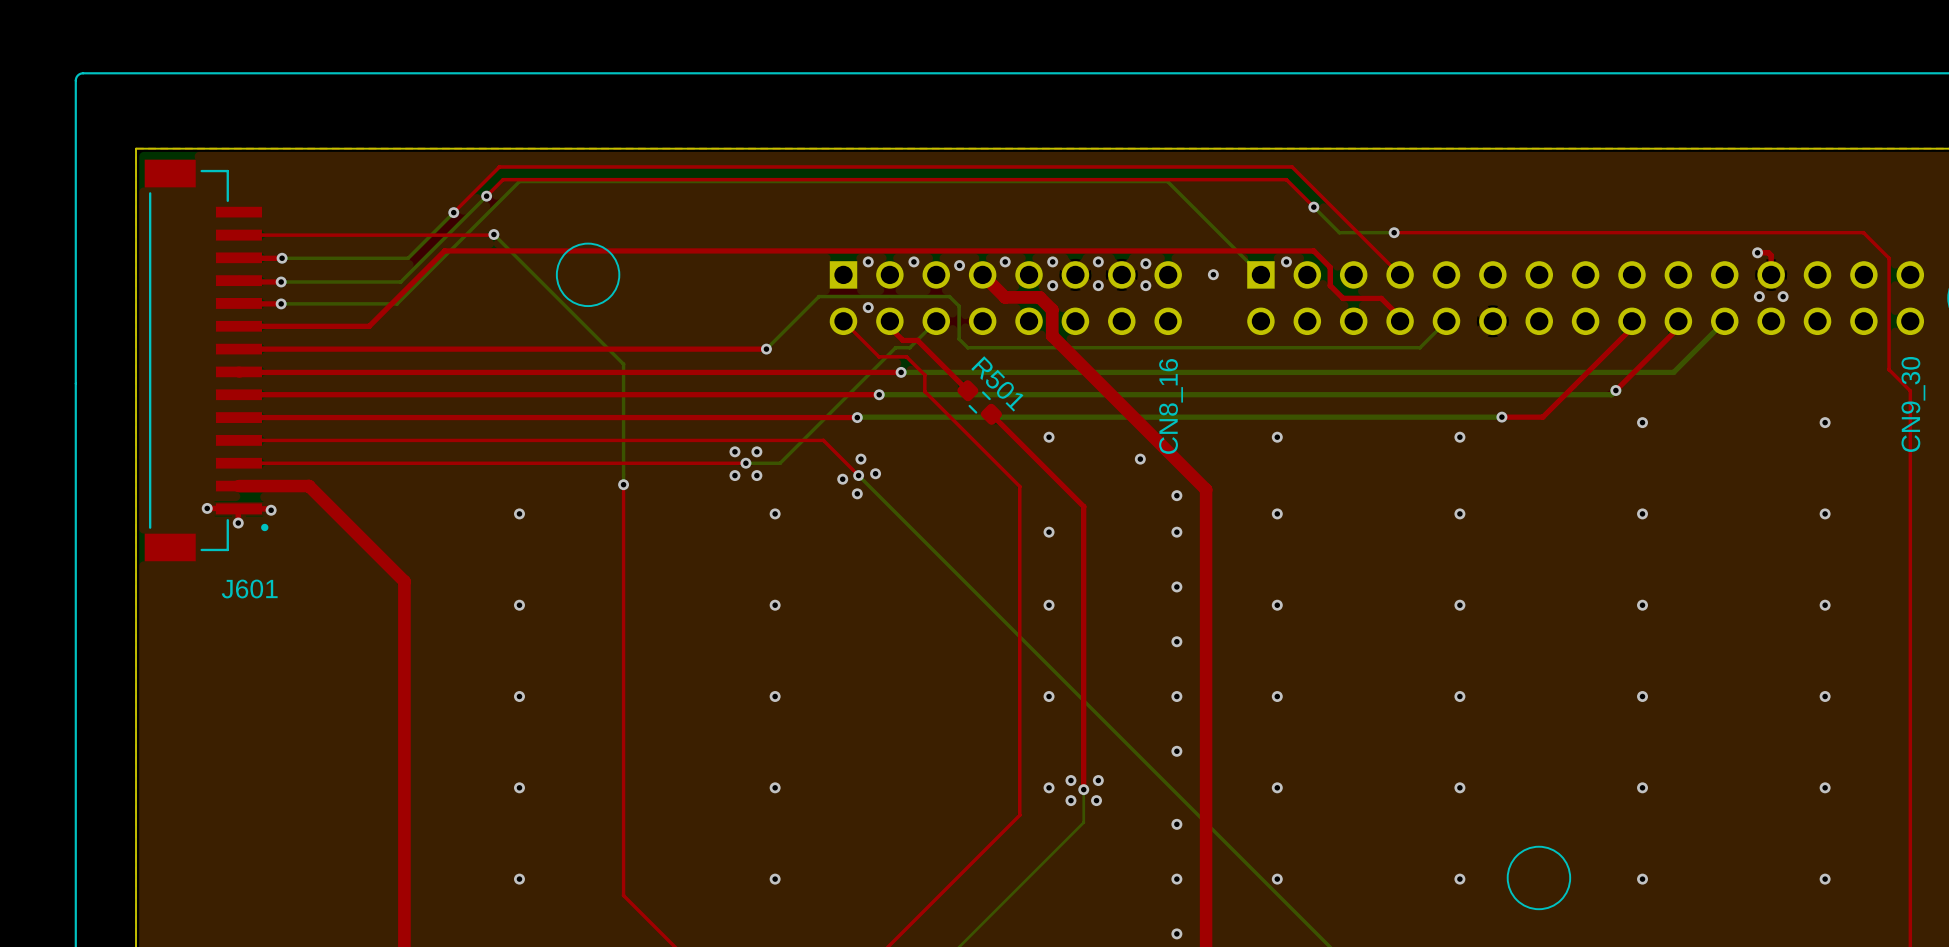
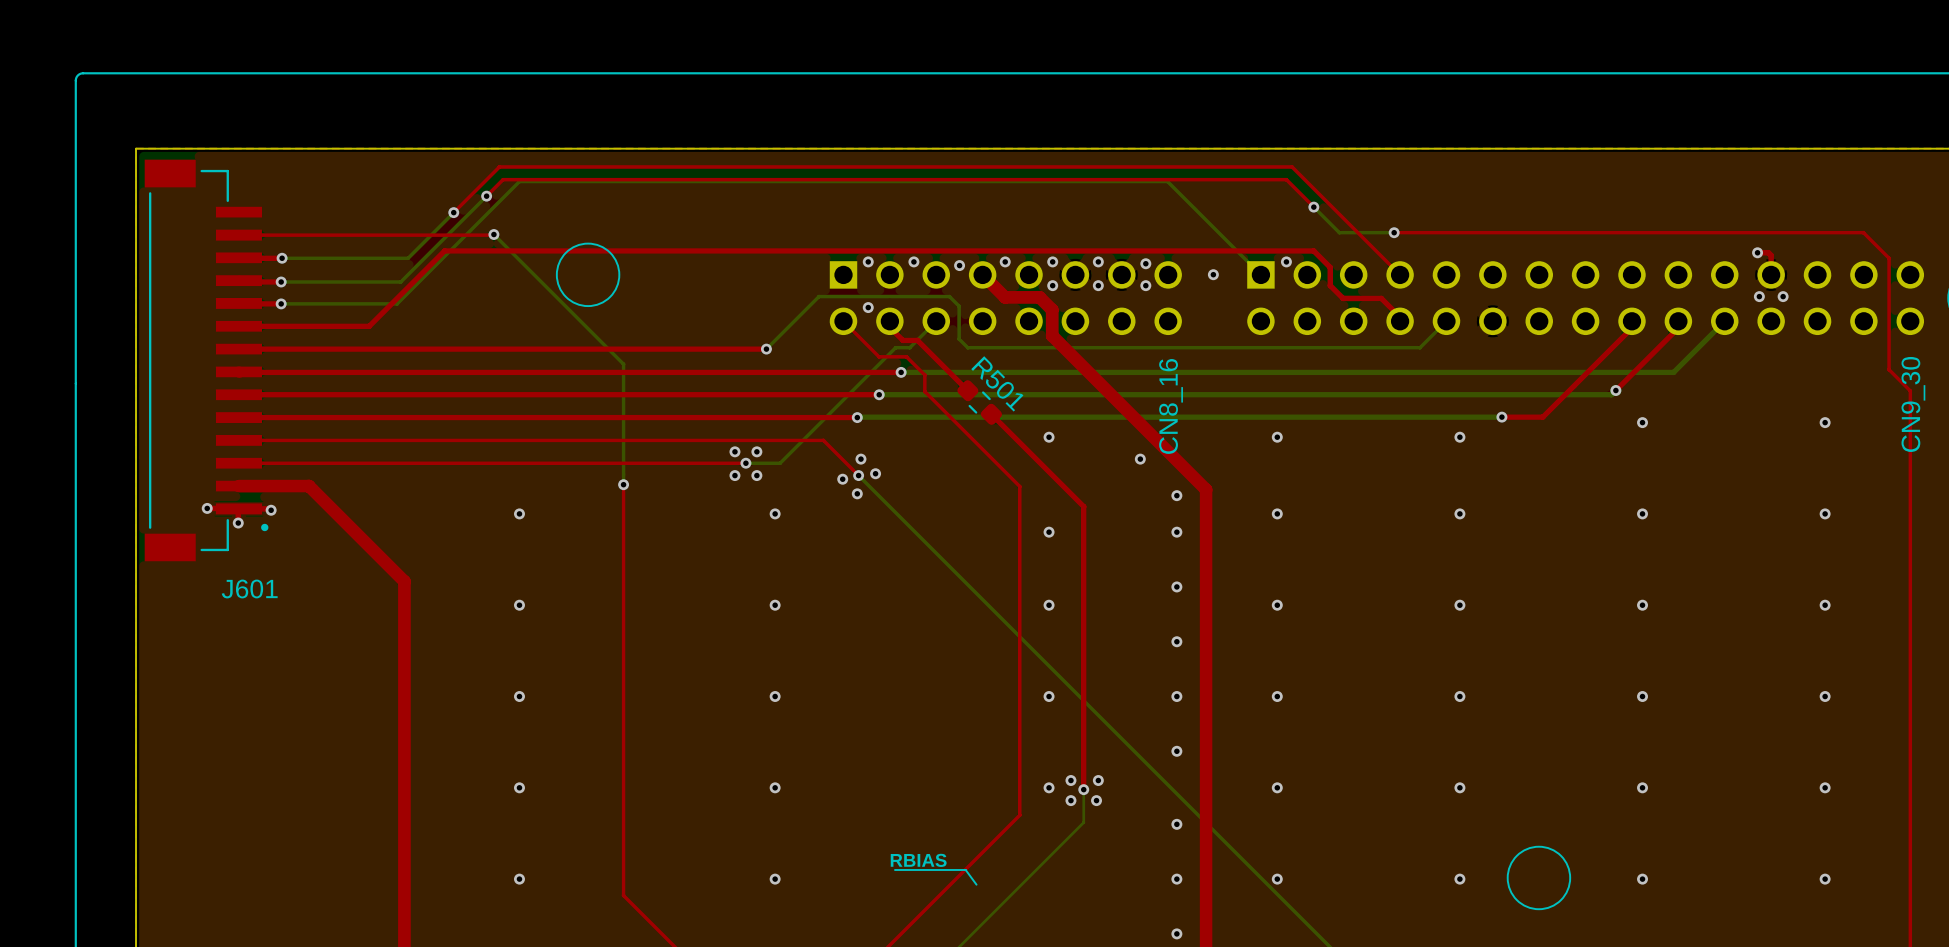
text: none -> RBIAS (918, 860)
line: none -> (894, 869) (965, 869) (976, 884)

